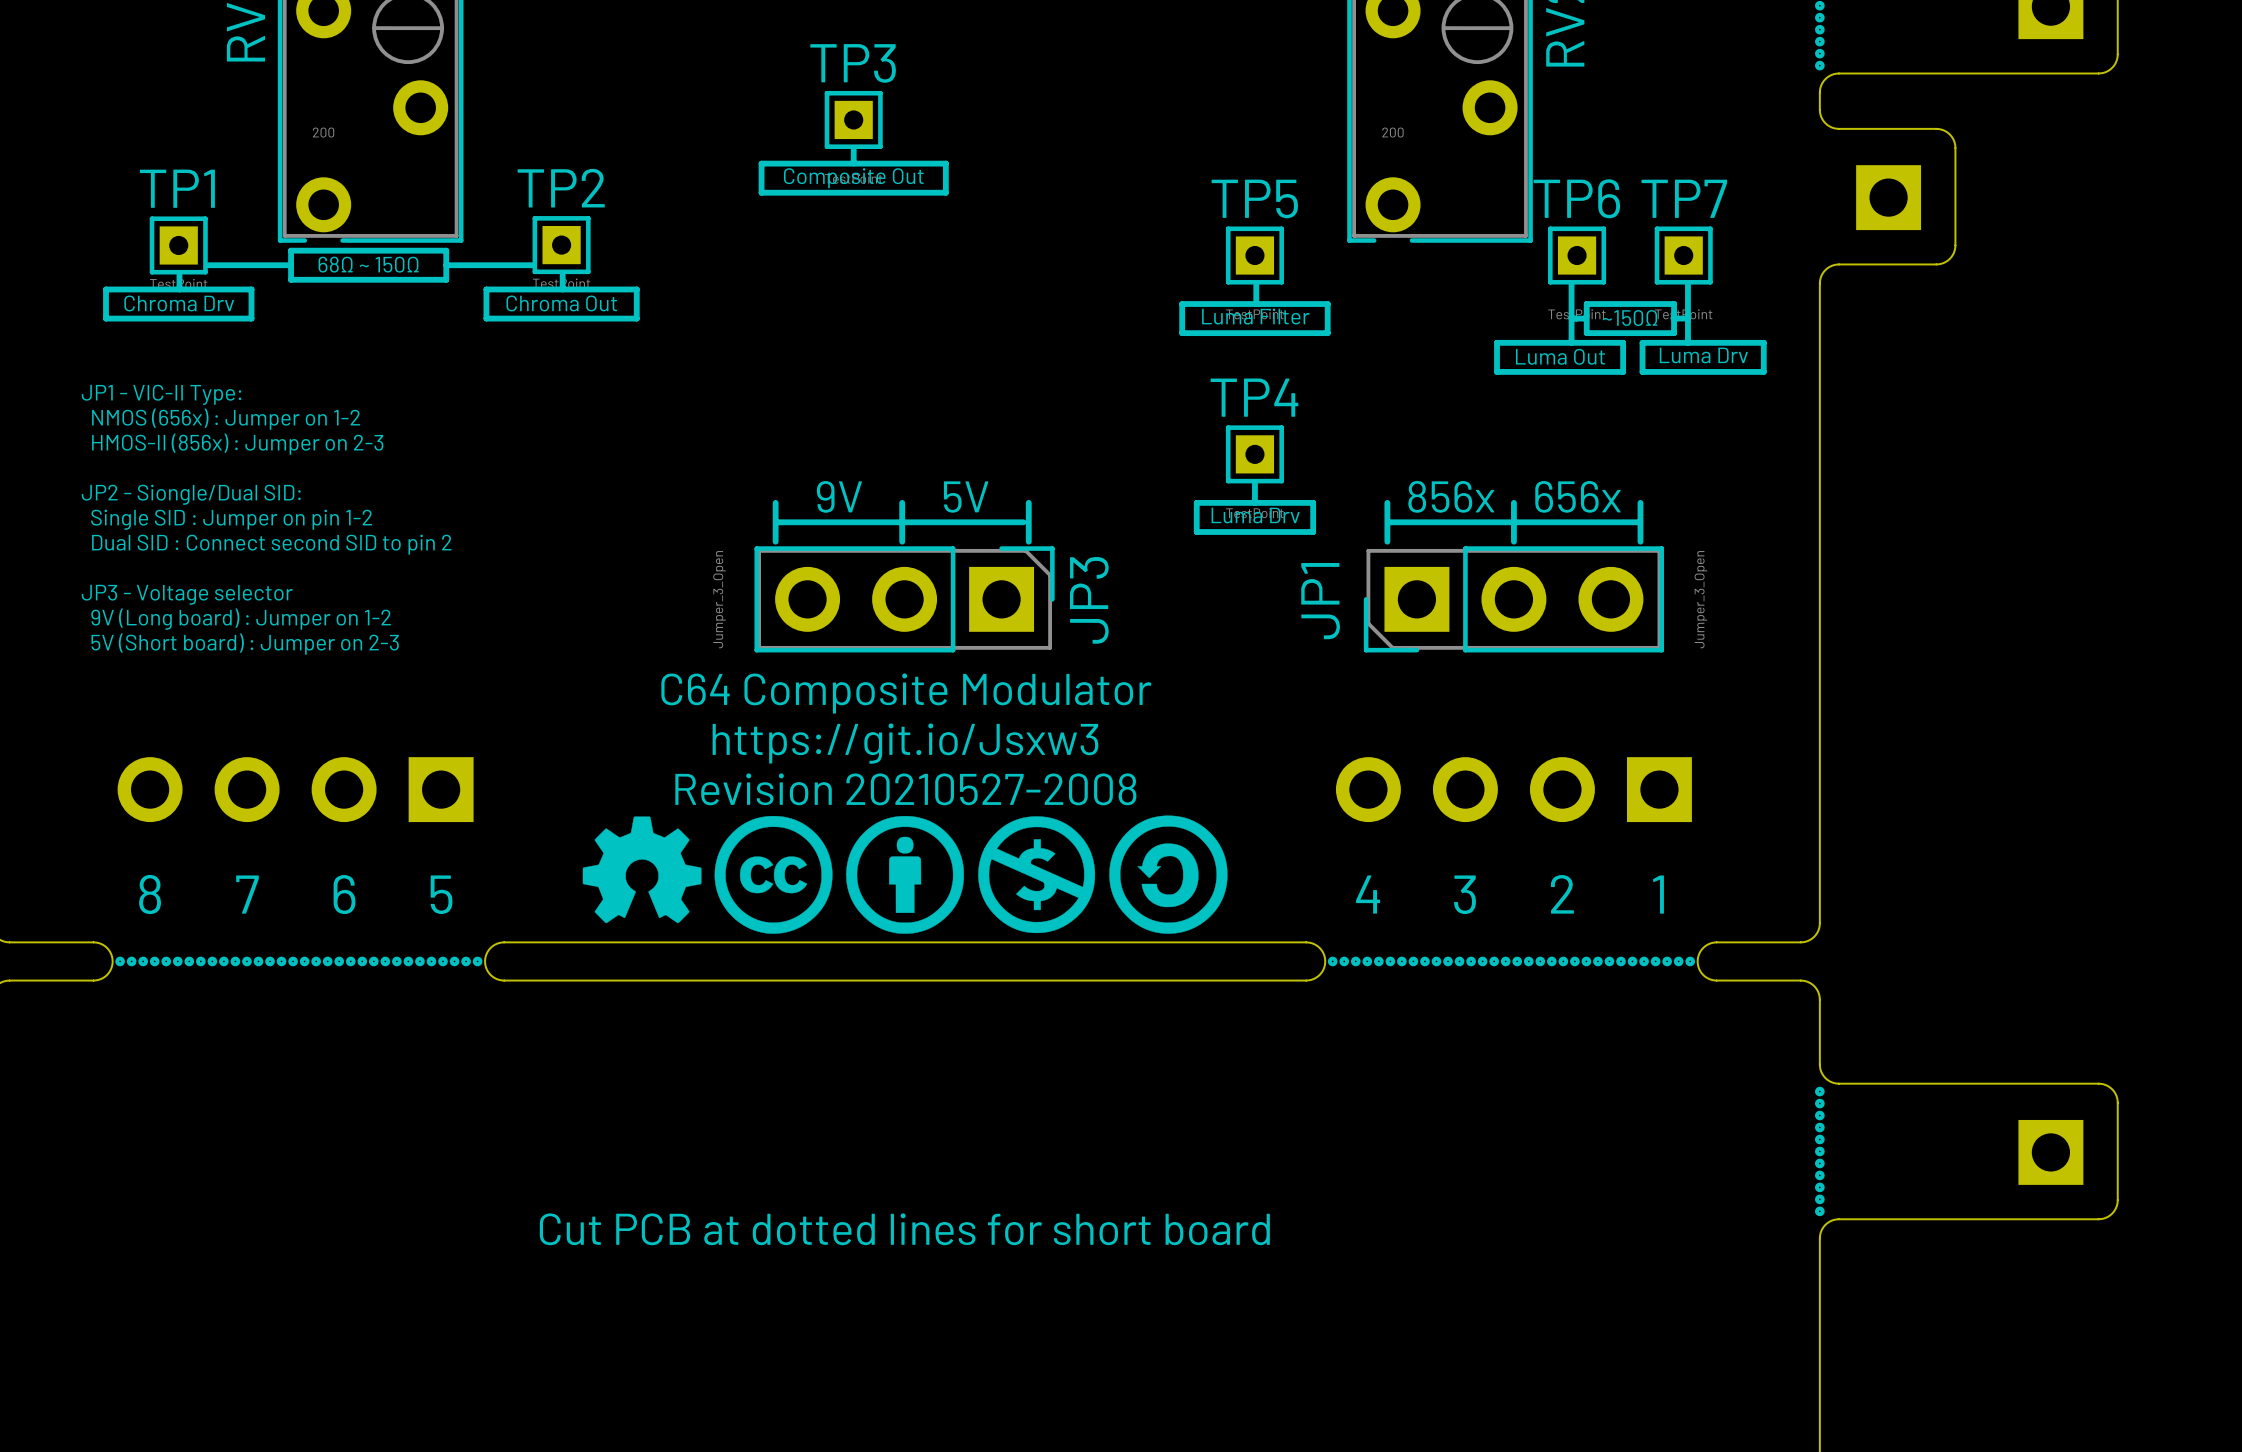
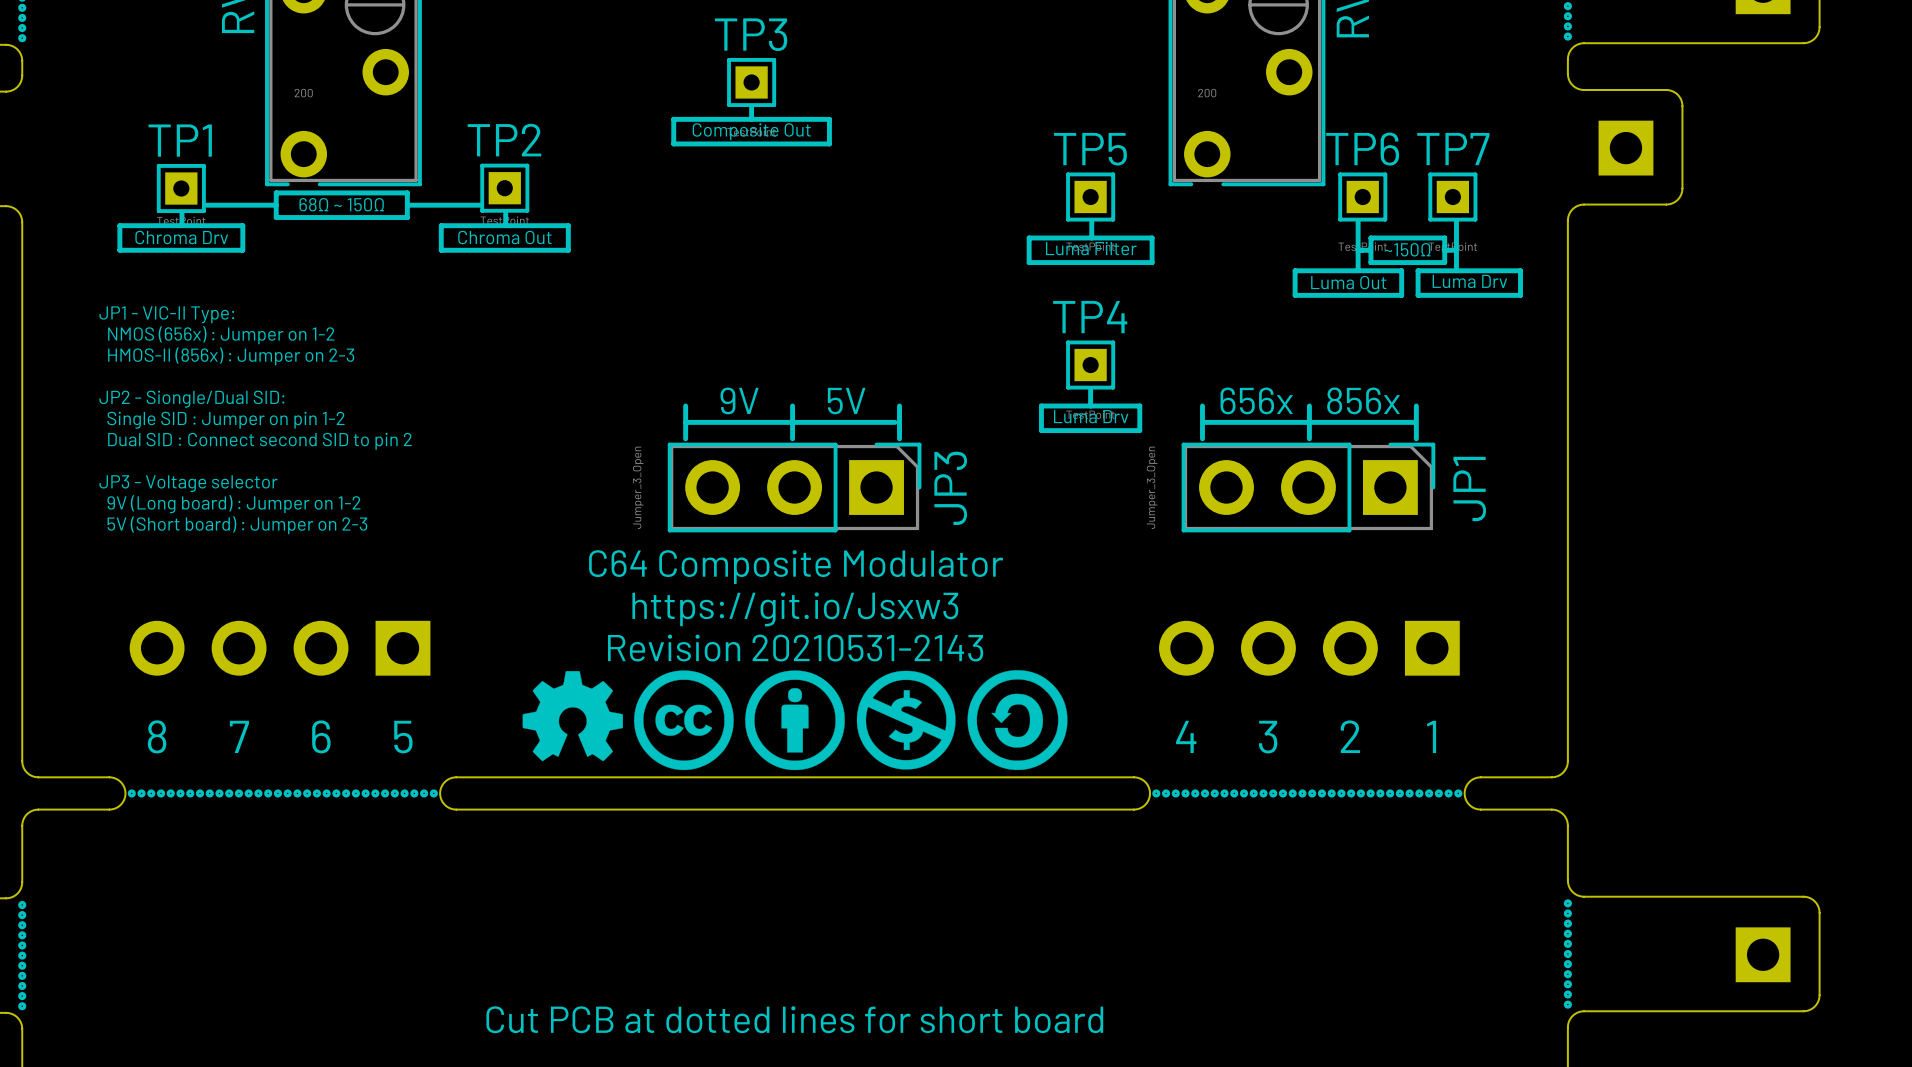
text: 856x (1451, 496) -> 656x (1256, 400)
text: 656x (1578, 496) -> 856x (1363, 400)
JP1 rotation: 0° (1513, 599) -> 180° (1308, 487)
text: Revision 20210527-2008 (905, 789) -> Revision 20210531-2143 (795, 648)

